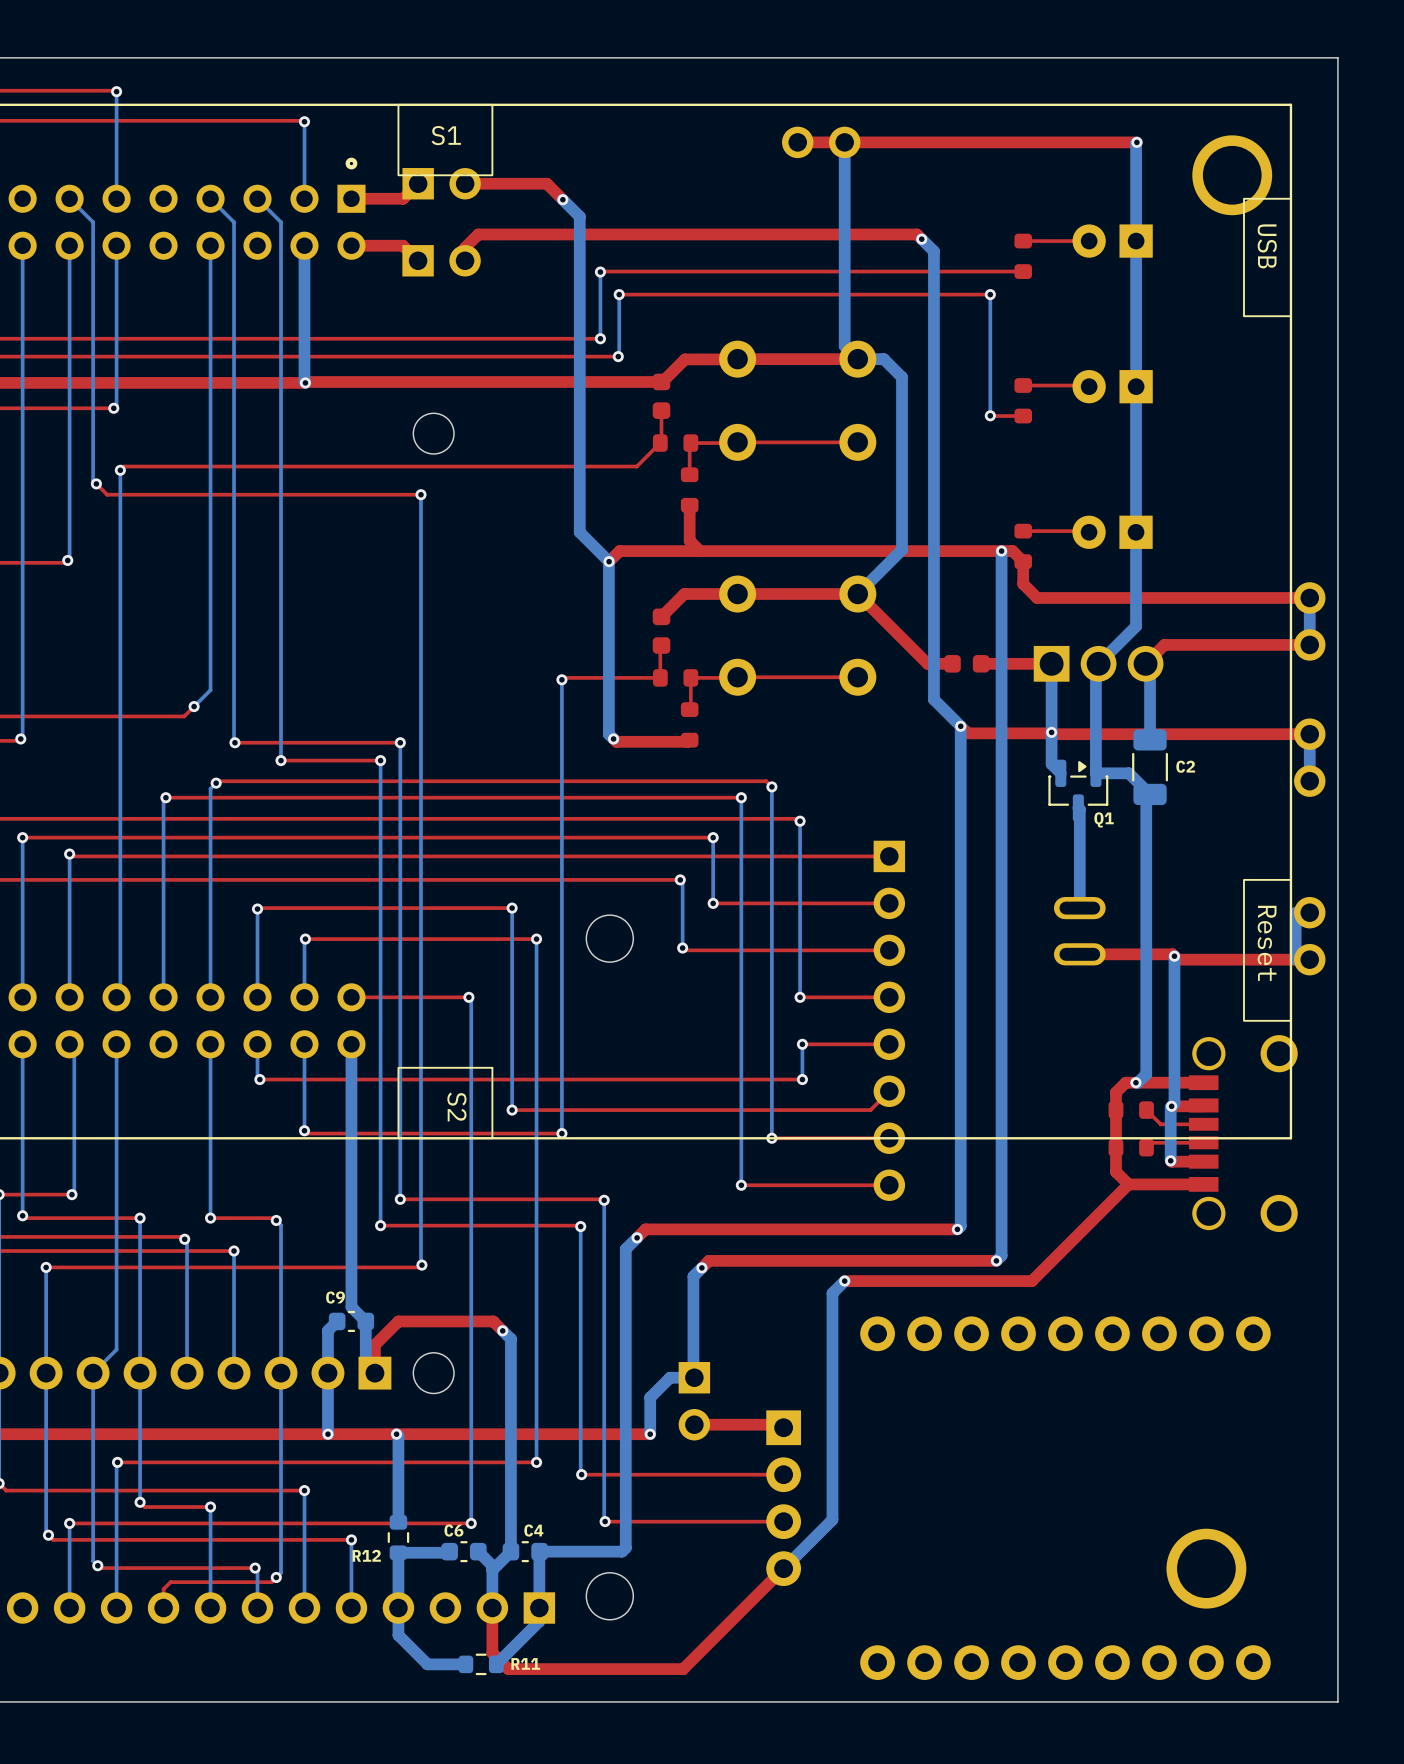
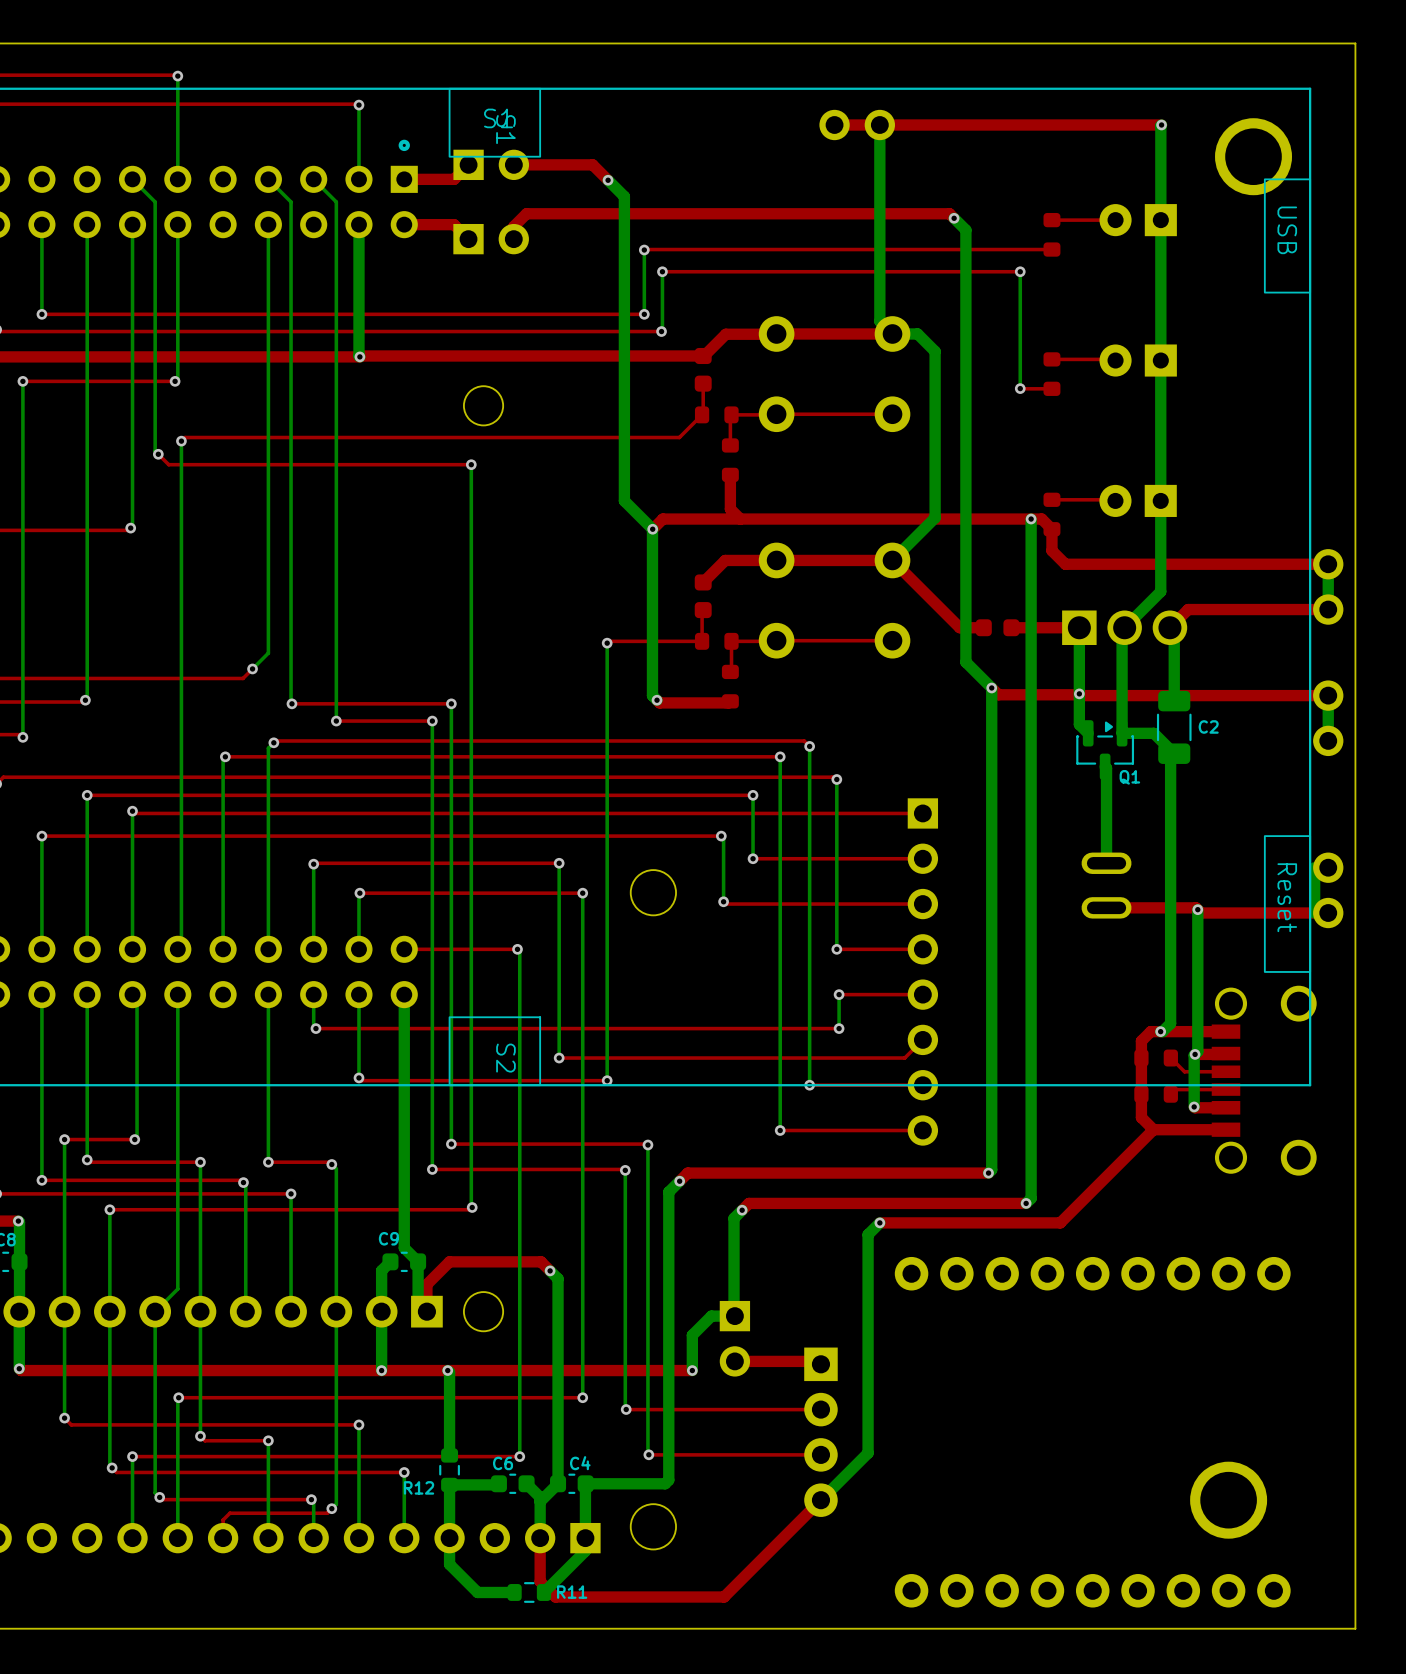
part text: none -> S1 (505, 129)

